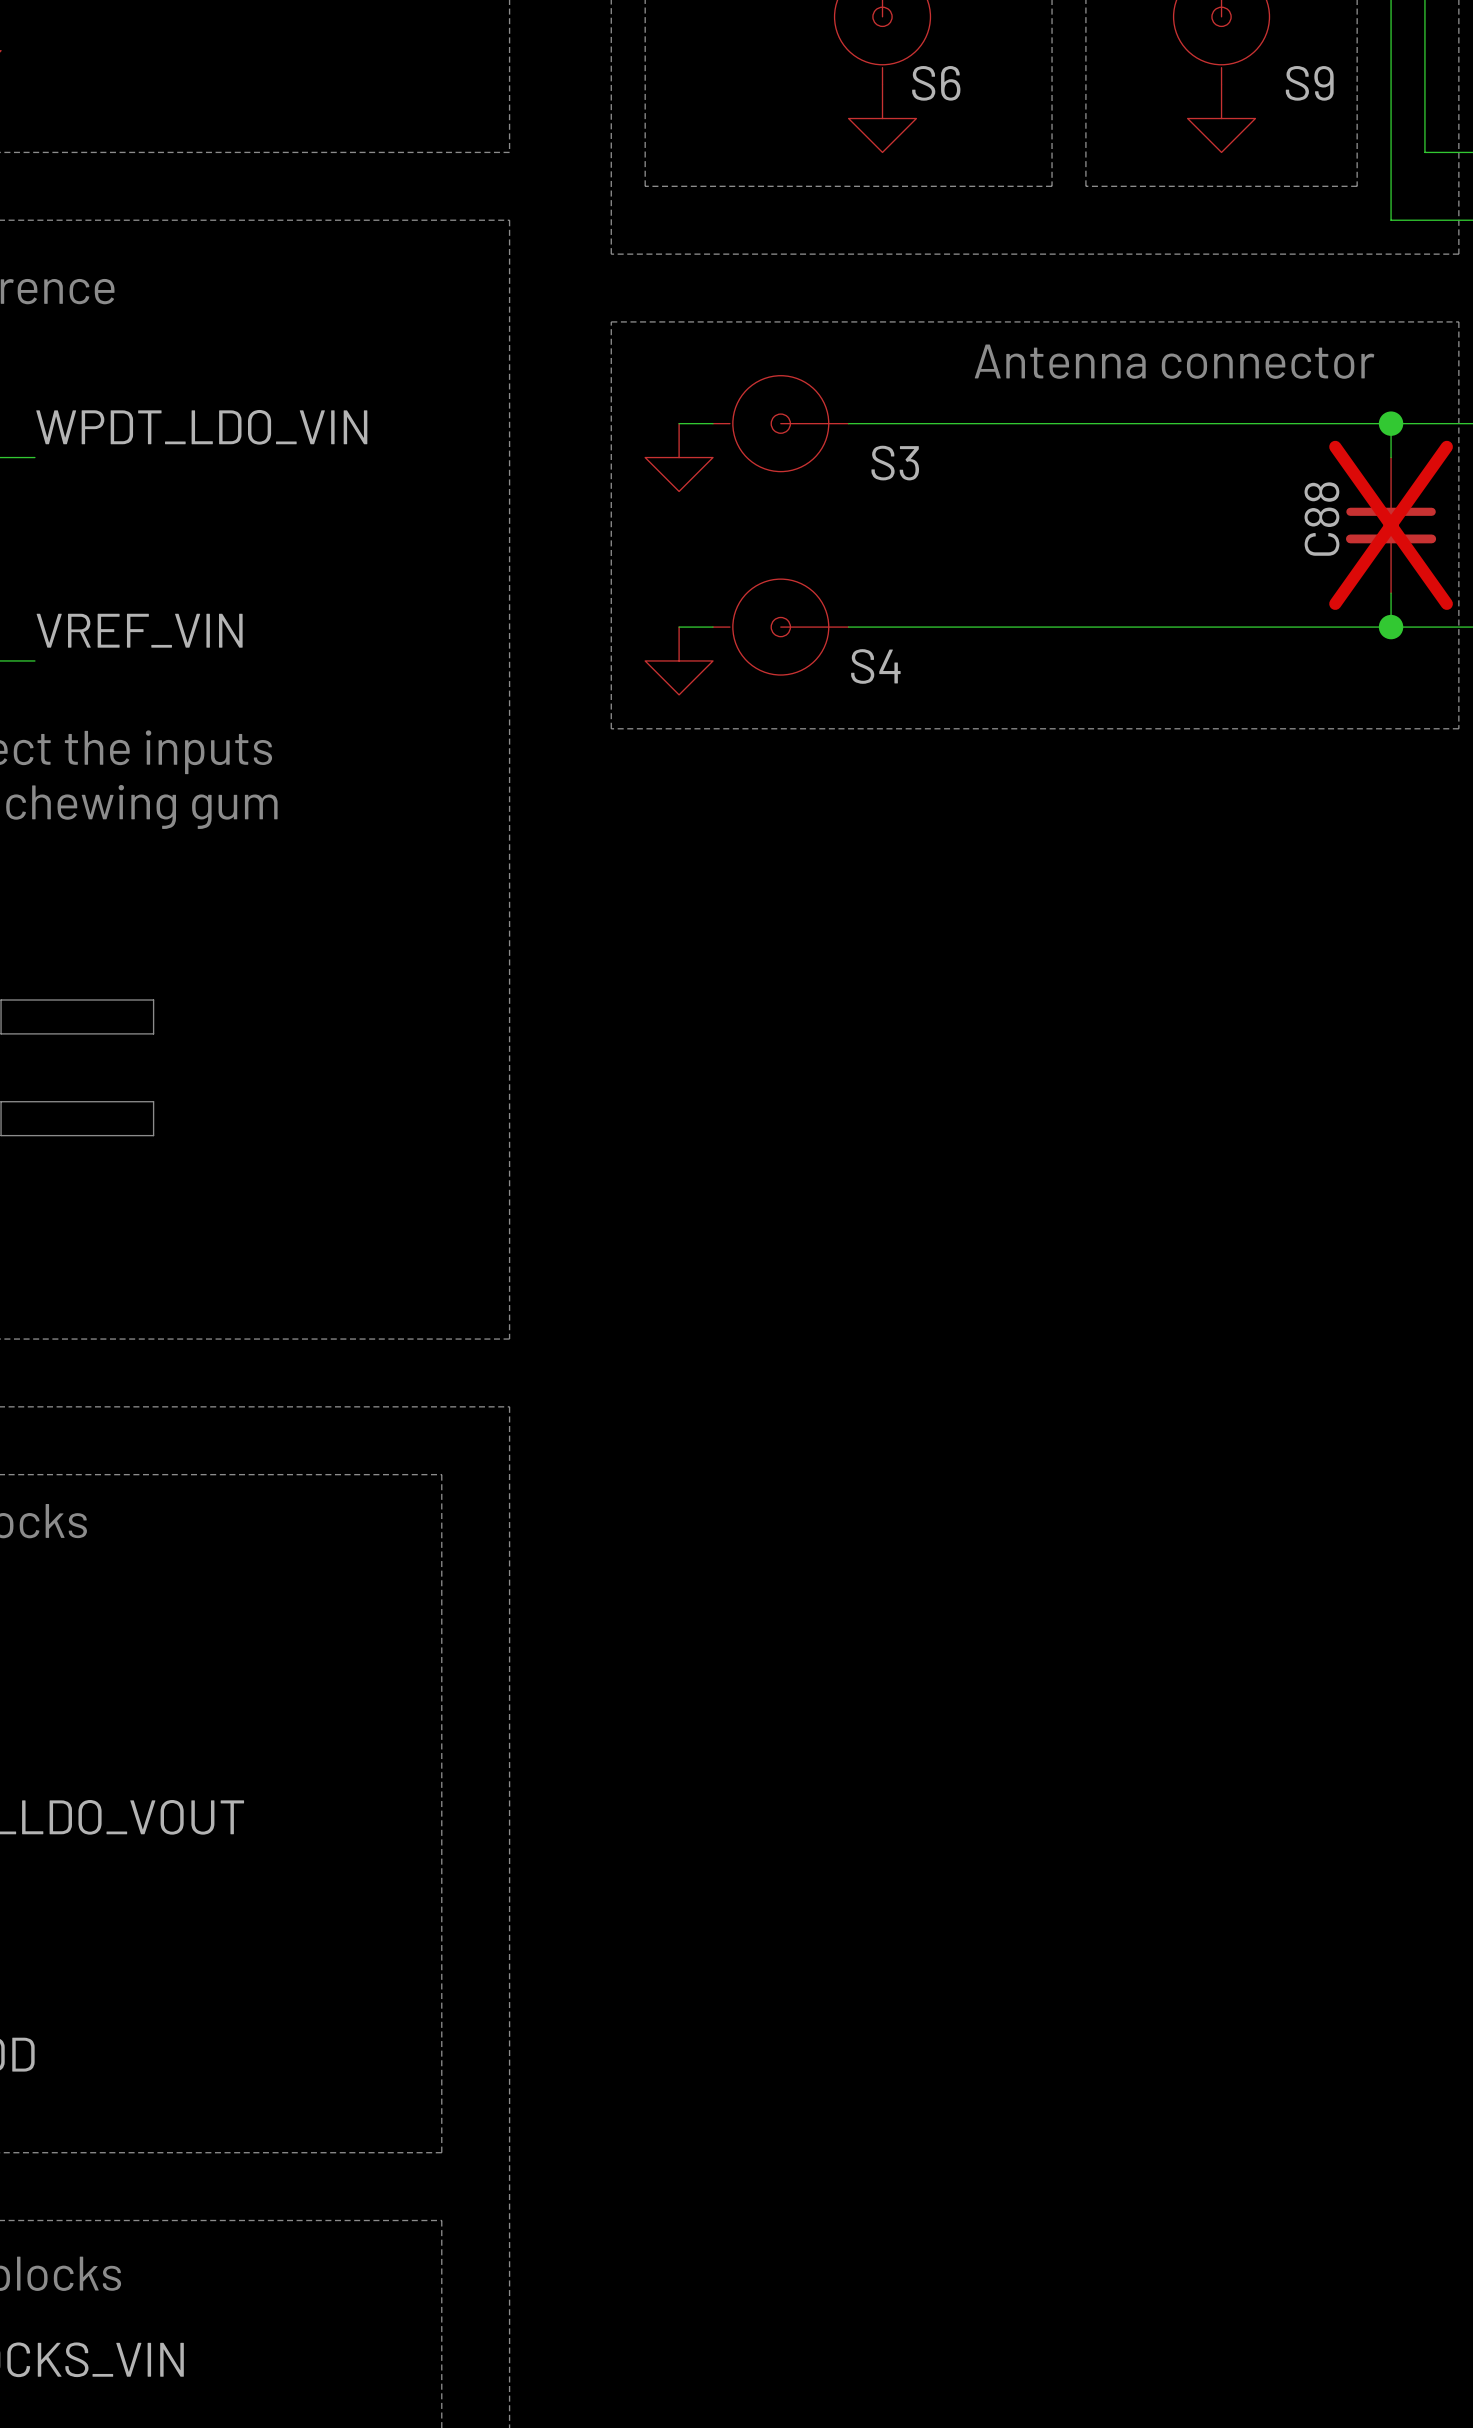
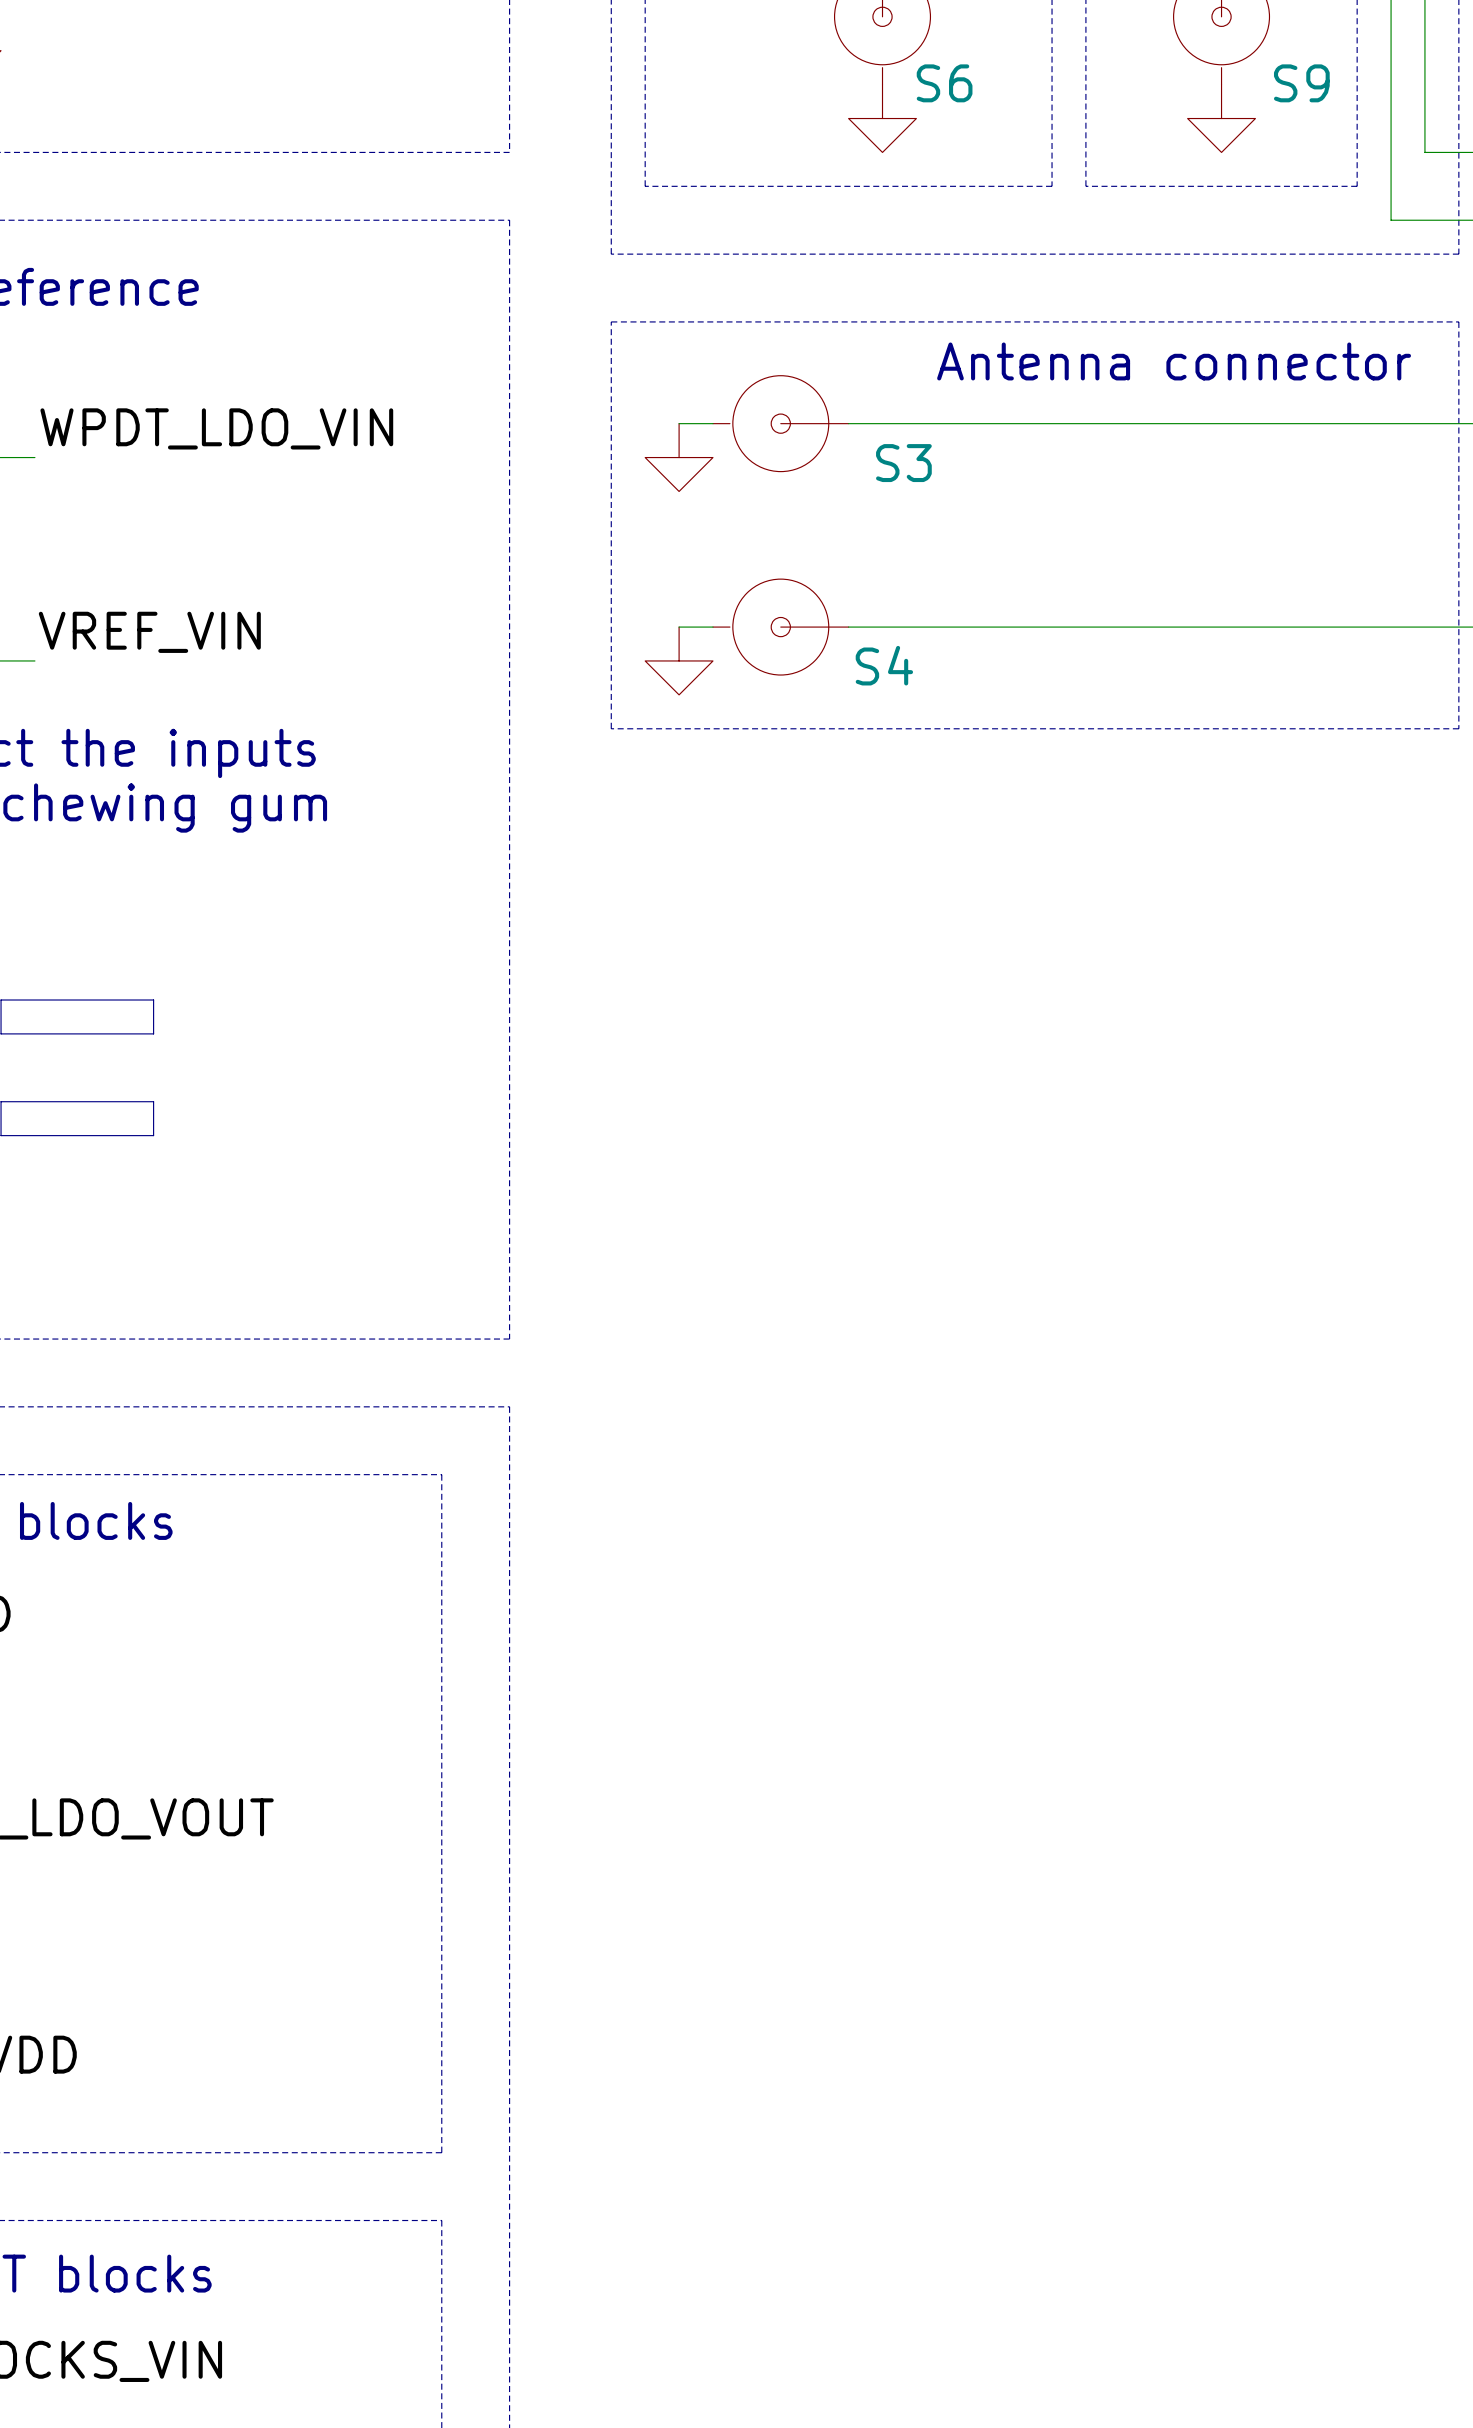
wire: (1391, 423) (1391, 457) -> none
junction: (1391, 423) -> none
C88: (1391, 525) -> none
wire: (1391, 593) (1391, 627) -> none
junction: (1391, 627) -> none

